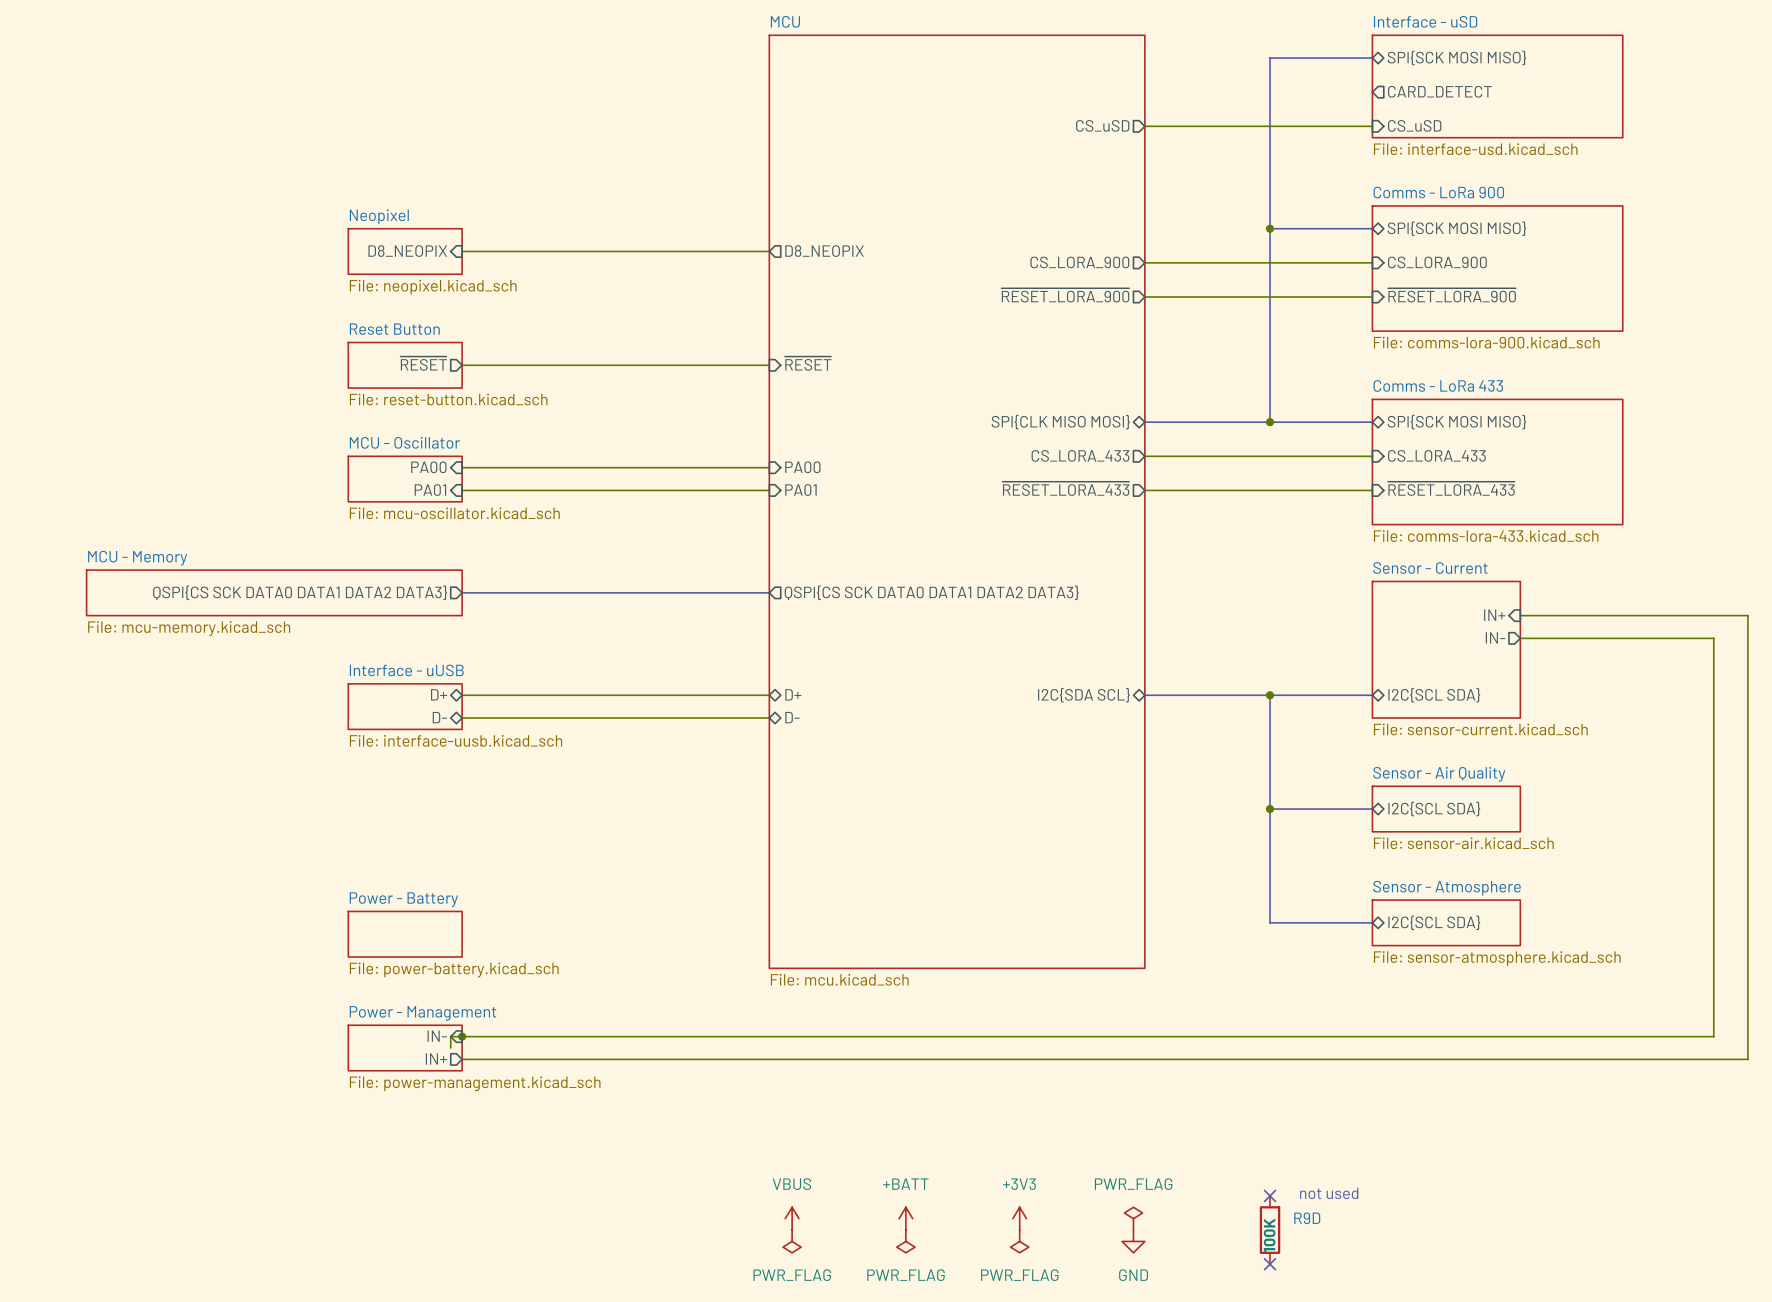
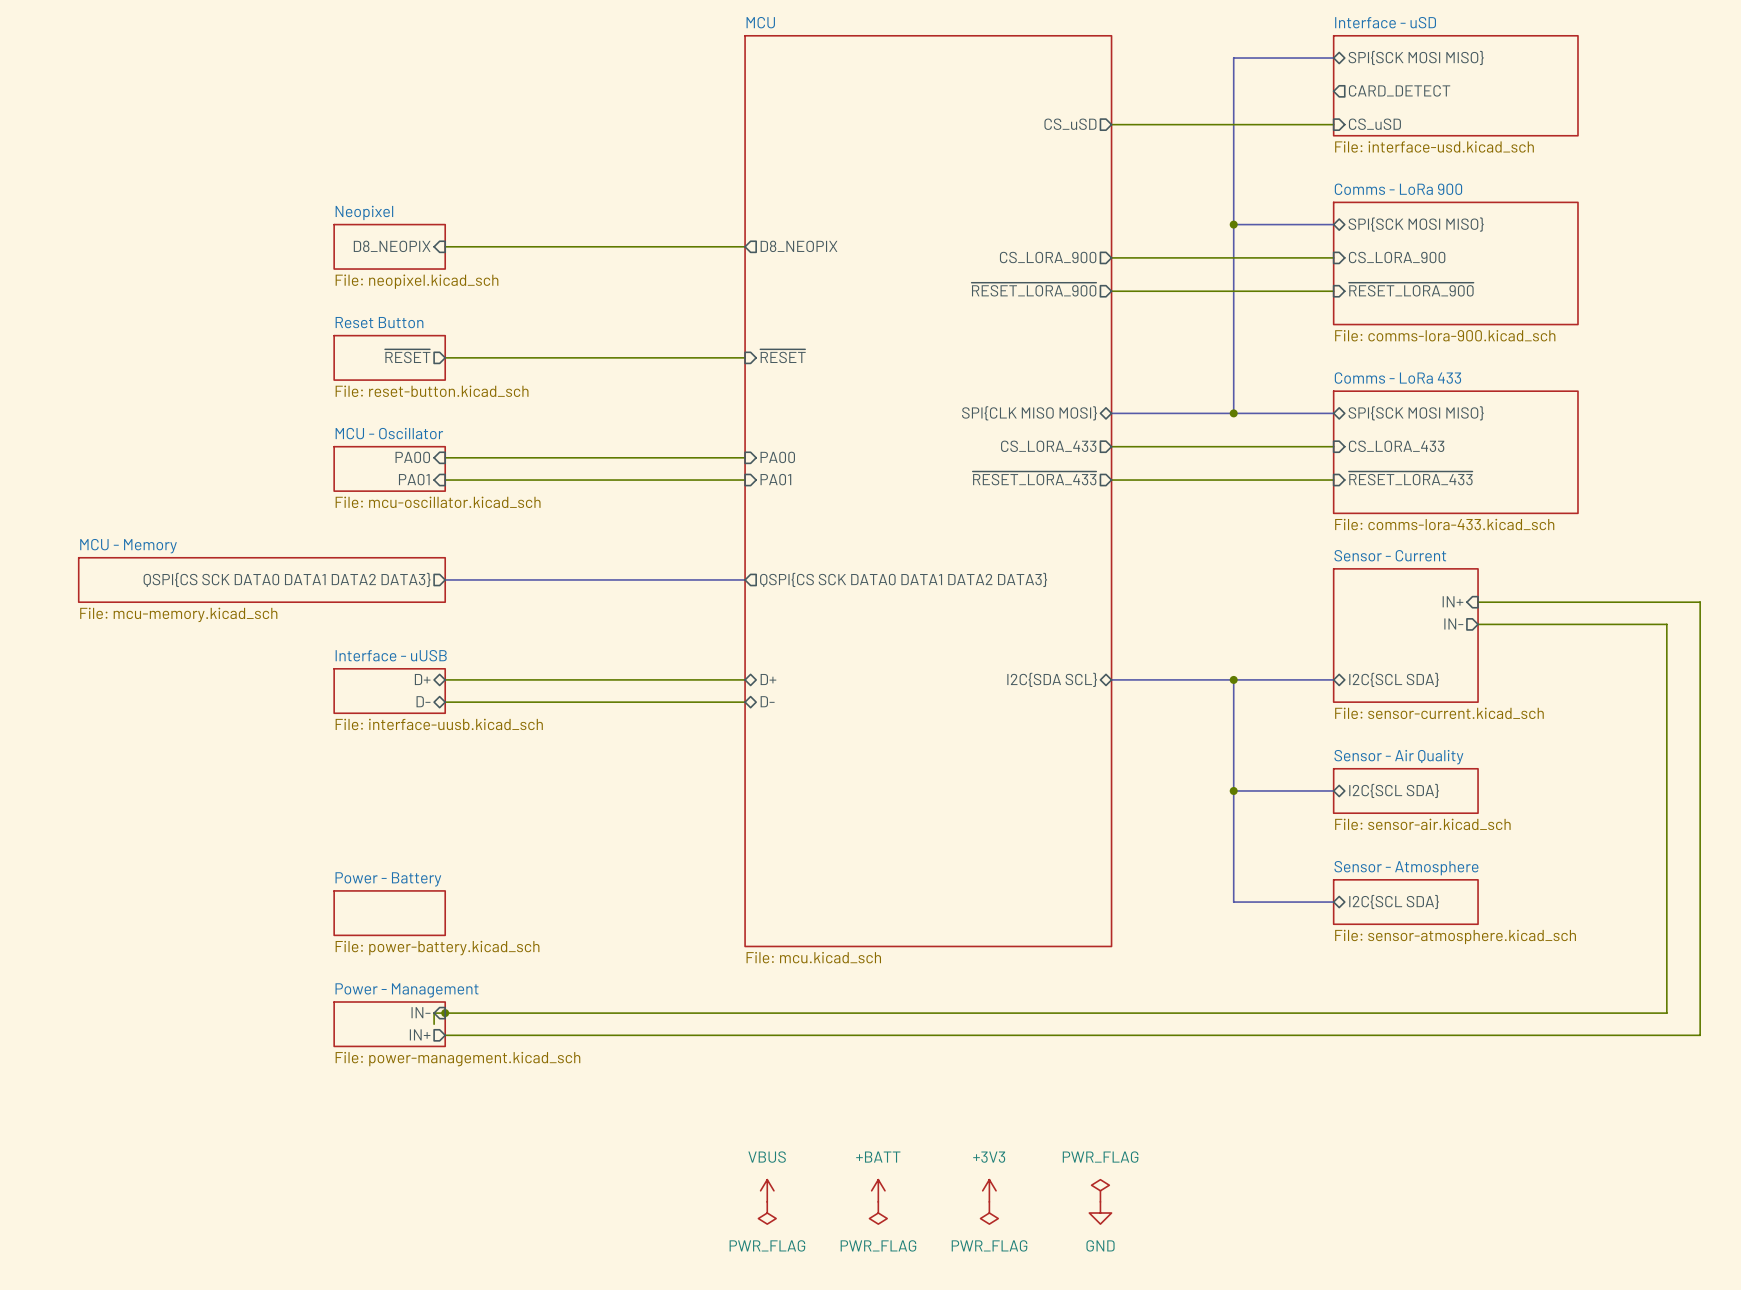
text: not used (1329, 1193) -> none
no-connect mark: (1270, 1195) -> none
R9D: 100K (1270, 1230) -> none
no-connect mark: (1270, 1264) -> none

